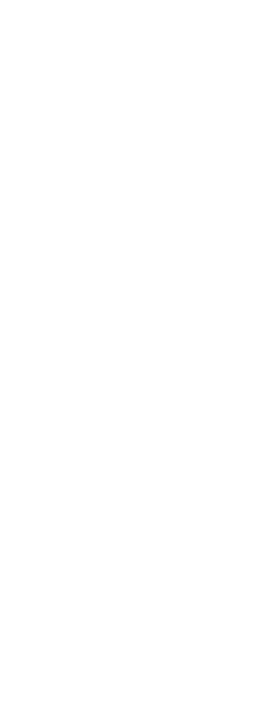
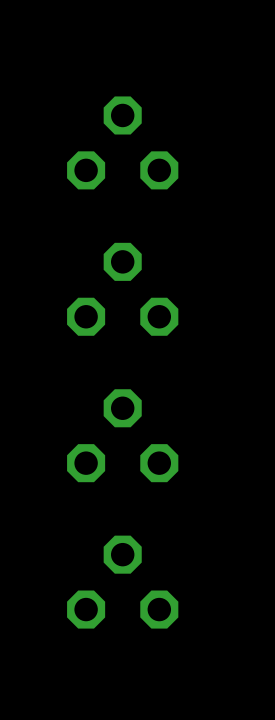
part: none -> (122, 142)
part: none -> (122, 289)
part: none -> (122, 435)
part: none -> (122, 582)

